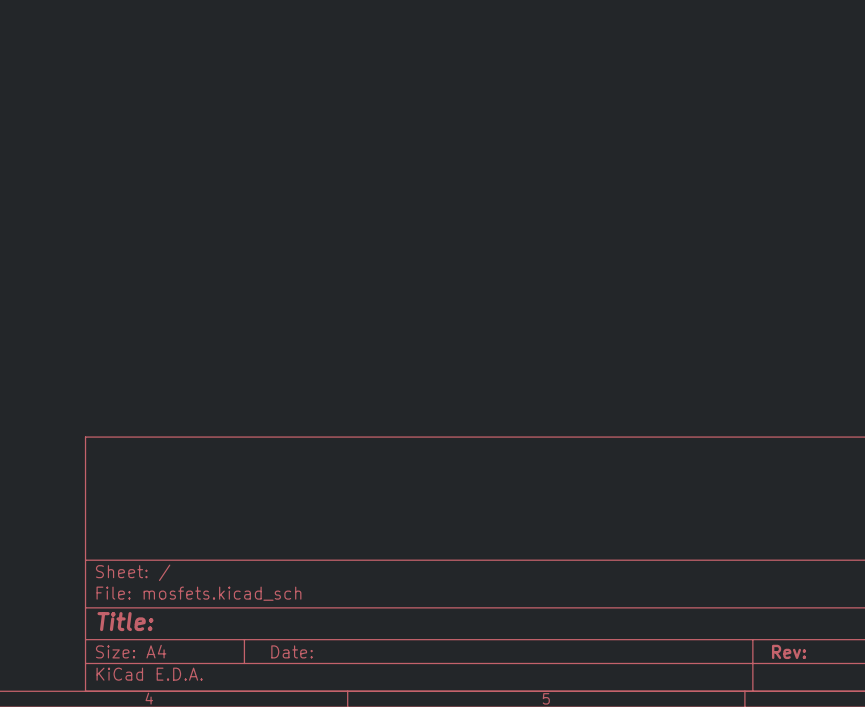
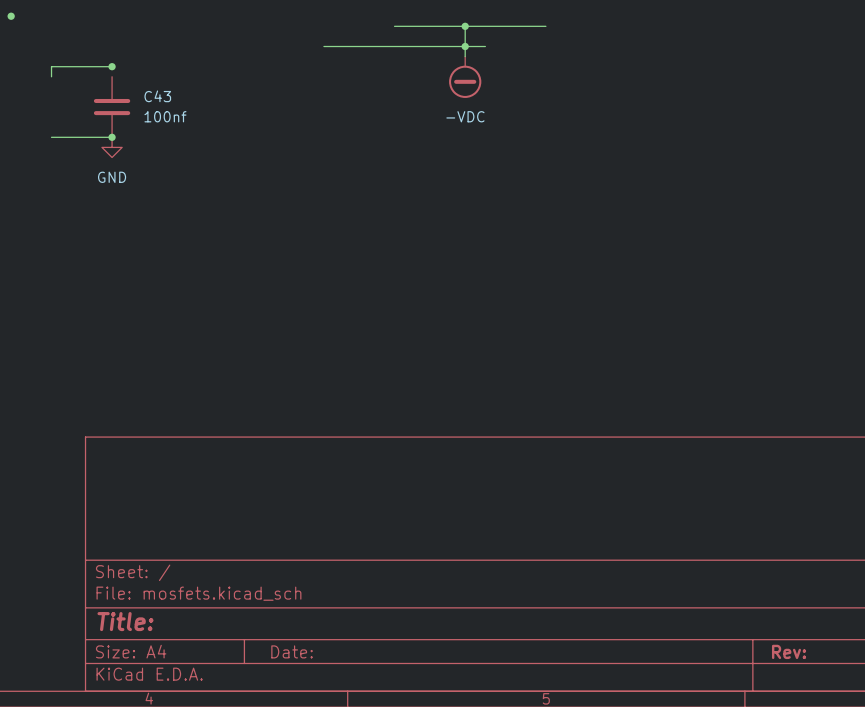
junction: none -> (11, 16)
wire: none -> (394, 26) (545, 26)
wire: none -> (465, 26) (465, 56)
junction: none -> (465, 26)
wire: none -> (323, 46) (485, 46)
junction: none -> (465, 46)
wire: none -> (112, 66) (51, 66) (51, 76)
junction: none -> (112, 66)
power symbol: none -> -VDC (465, 77)
C43: none -> 100nf (112, 107)
wire: none -> (51, 137) (112, 137)
junction: none -> (112, 137)
power symbol: none -> GND (112, 147)

